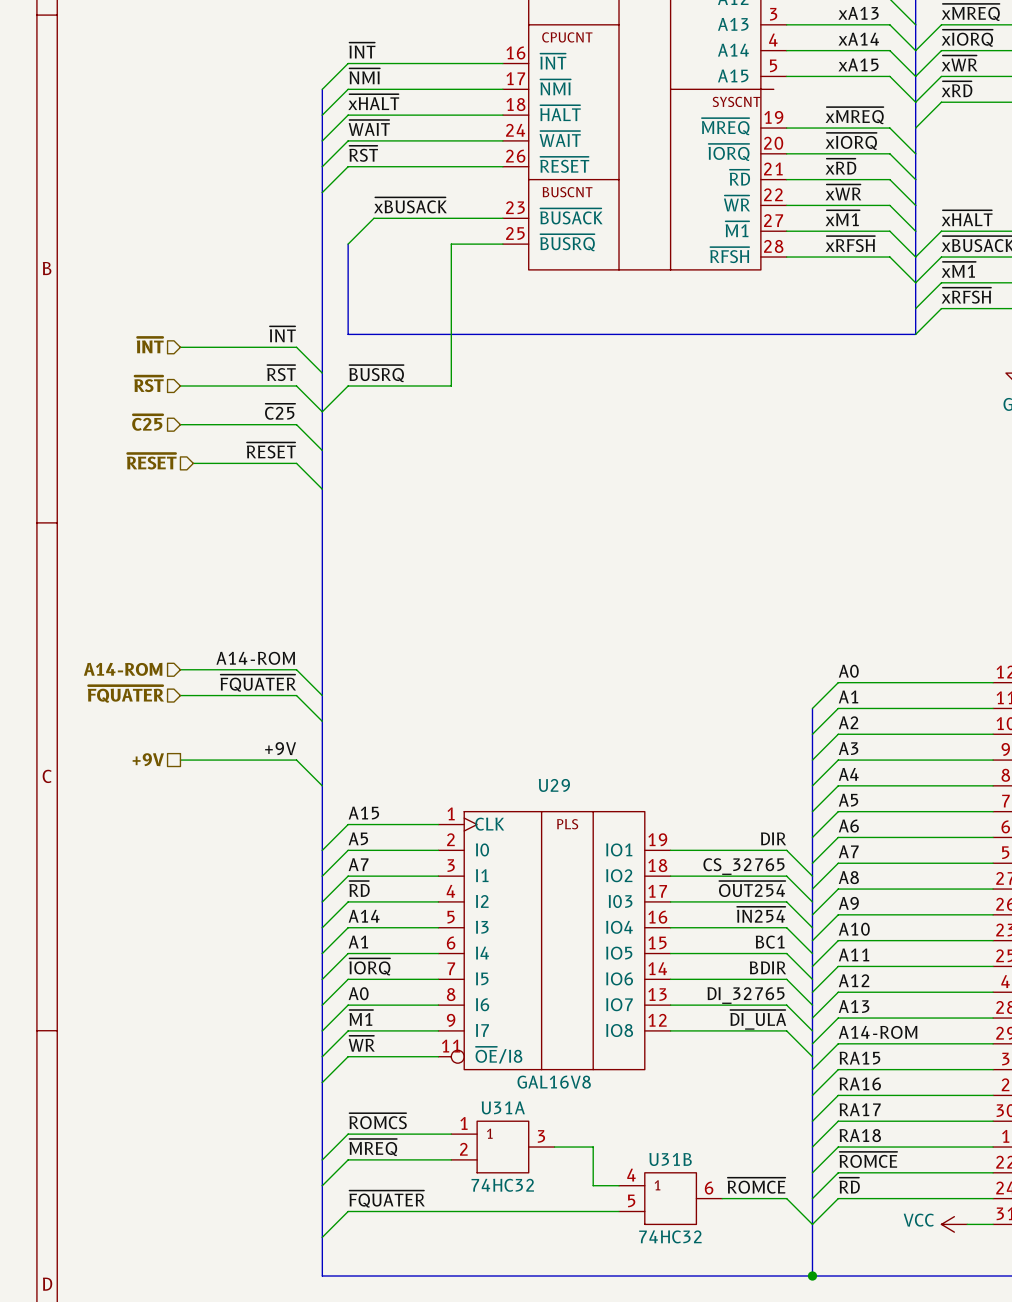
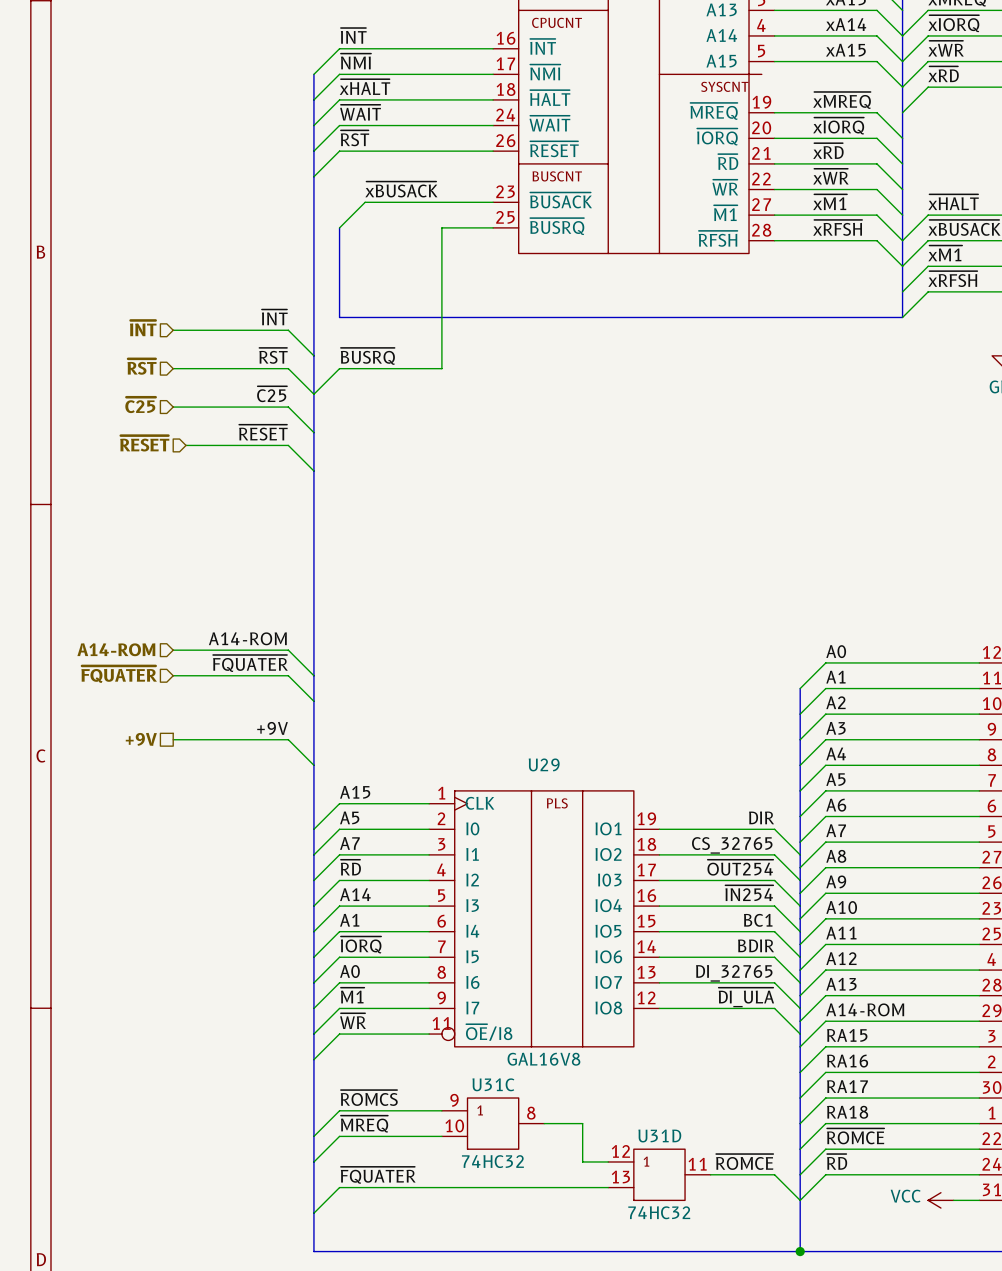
U31A name: U31A (503, 1107) -> U31C (493, 1084)
U31A pin number: 1 (463, 1123) -> 9 (454, 1100)
U31A pin number: 3 (541, 1136) -> 8 (531, 1113)
U31A pin number: 2 (463, 1149) -> 10 (454, 1125)
U31B name: U31B (670, 1159) -> U31D (659, 1135)
U31B pin number: 4 (631, 1175) -> 12 (620, 1151)
U31B pin number: 6 (709, 1188) -> 11 (697, 1164)
U31B pin number: 5 (631, 1200) -> 13 (620, 1177)

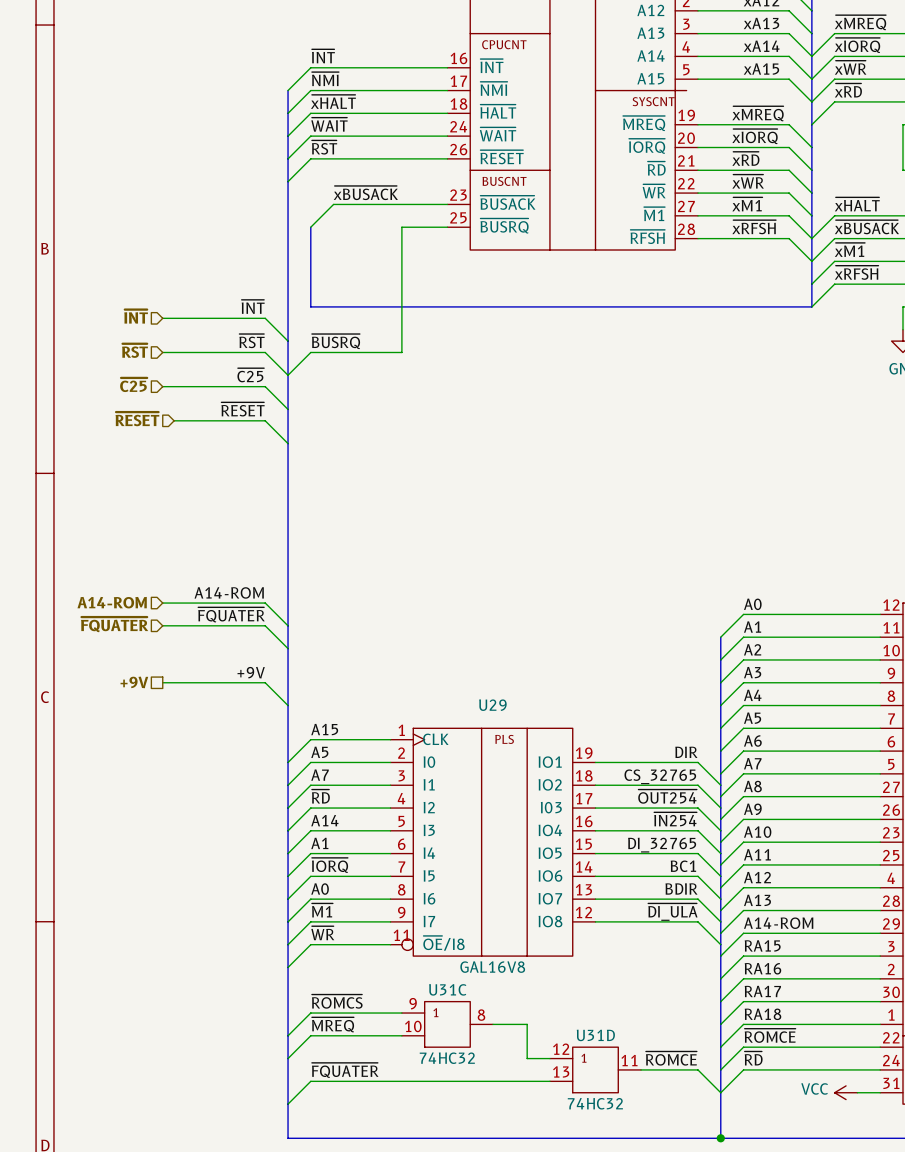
label: BC1 (758, 920) -> DI_32765 (662, 845)
label: BDIR (756, 945) -> BC1 (683, 866)
label: DI_32765 (734, 973) -> BDIR (681, 888)

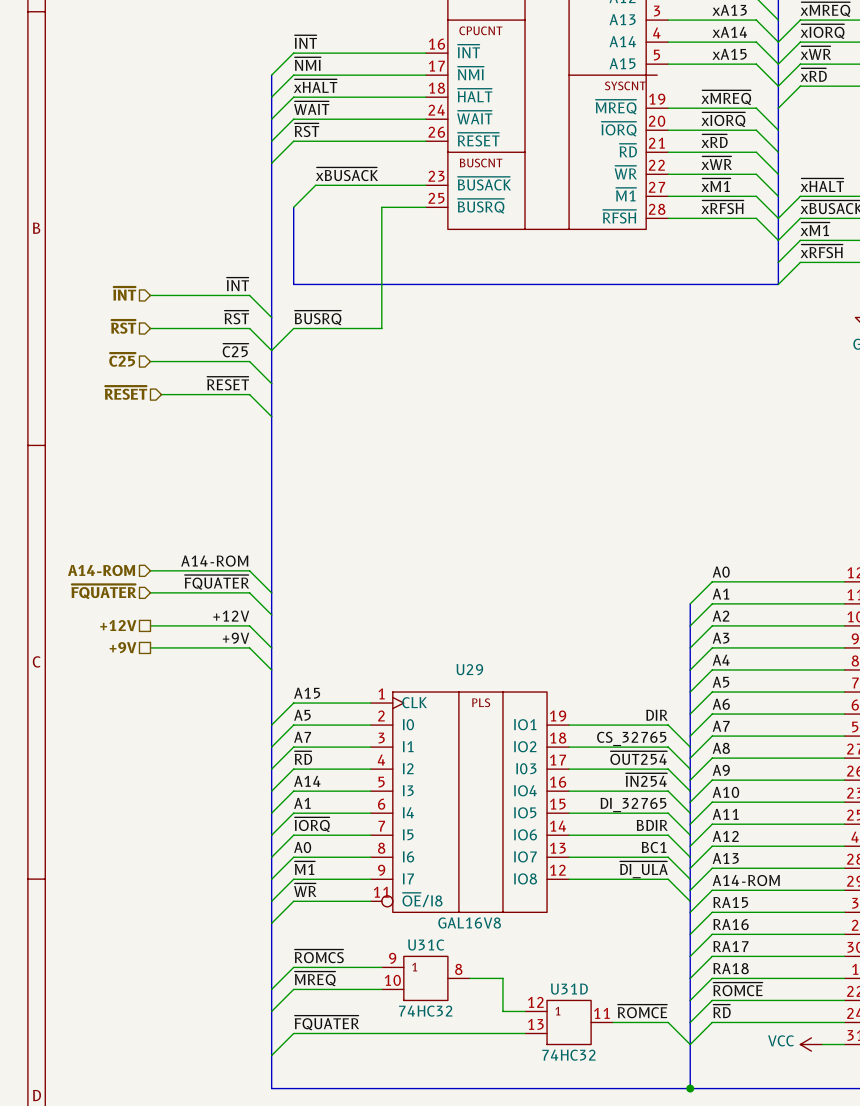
label: none -> +12V (231, 616)
hierarchical label: none -> +12V (118, 625)
wire: none -> (150, 625) (249, 625) (271, 647)
label: BC1 (683, 866) -> BDIR (652, 825)
label: BDIR (681, 888) -> BC1 (654, 847)

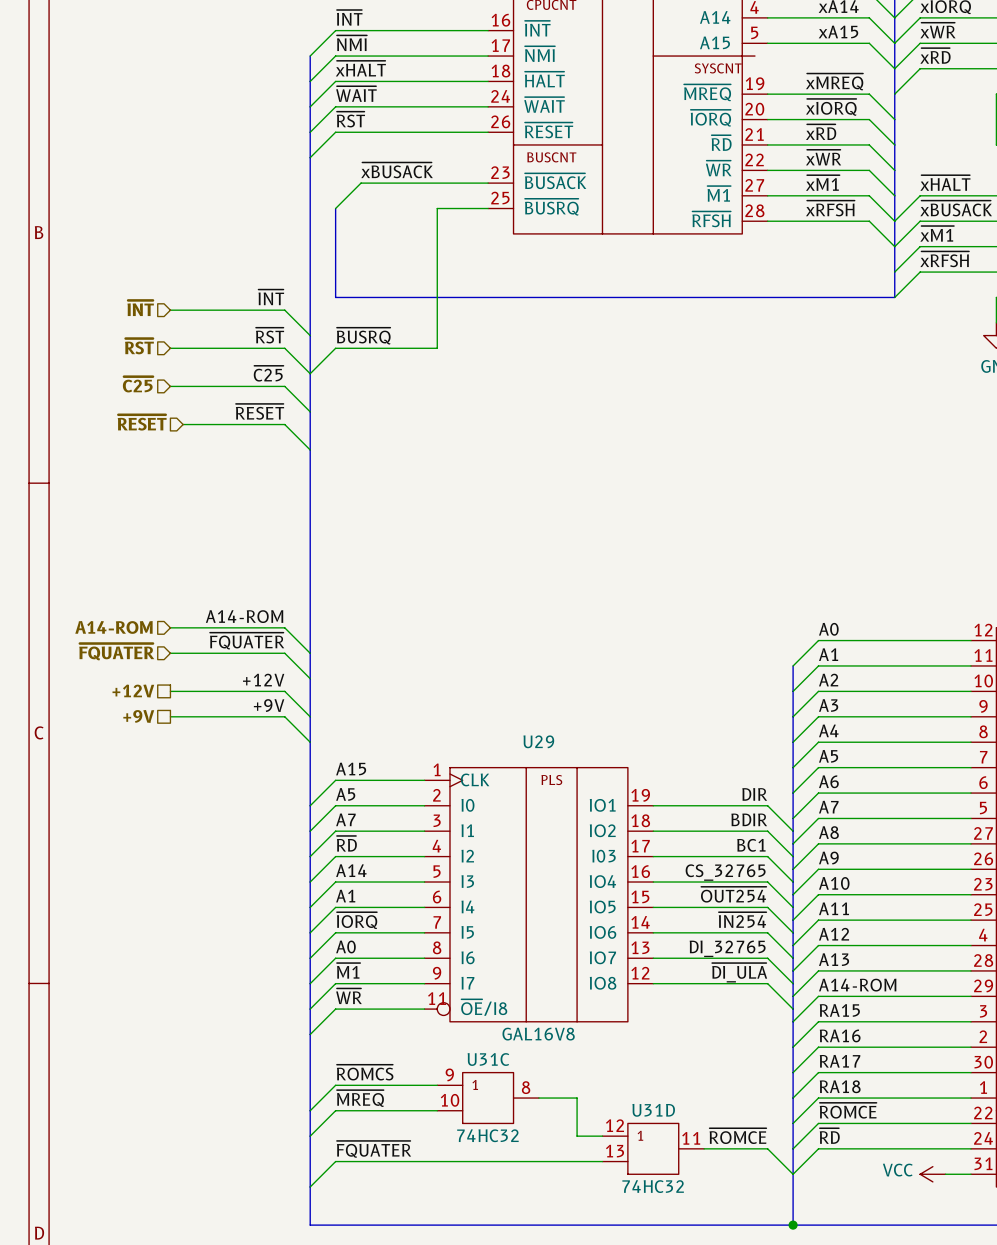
label: CS_32765 (631, 738) -> BDIR (749, 819)
label: ~{OUT254} (638, 758) -> BC1 (751, 845)
label: ~{IN254} (646, 780) -> CS_32765 (725, 872)
label: DI_32765 (633, 805) -> ~{OUT254} (733, 894)
label: BDIR (652, 825) -> ~{IN254} (742, 920)
label: BC1 (654, 847) -> DI_32765 (727, 948)

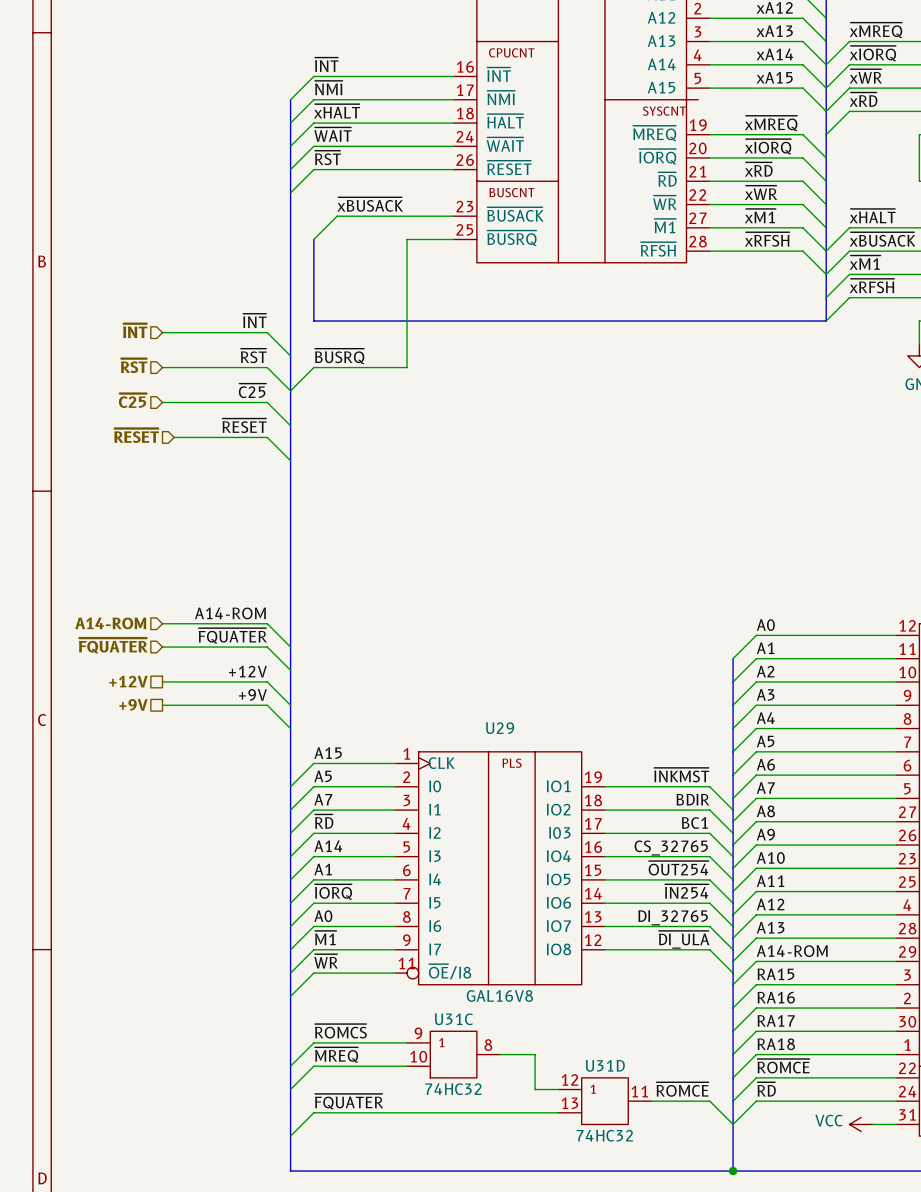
label: DIR (754, 794) -> ~{INKMST} (681, 775)

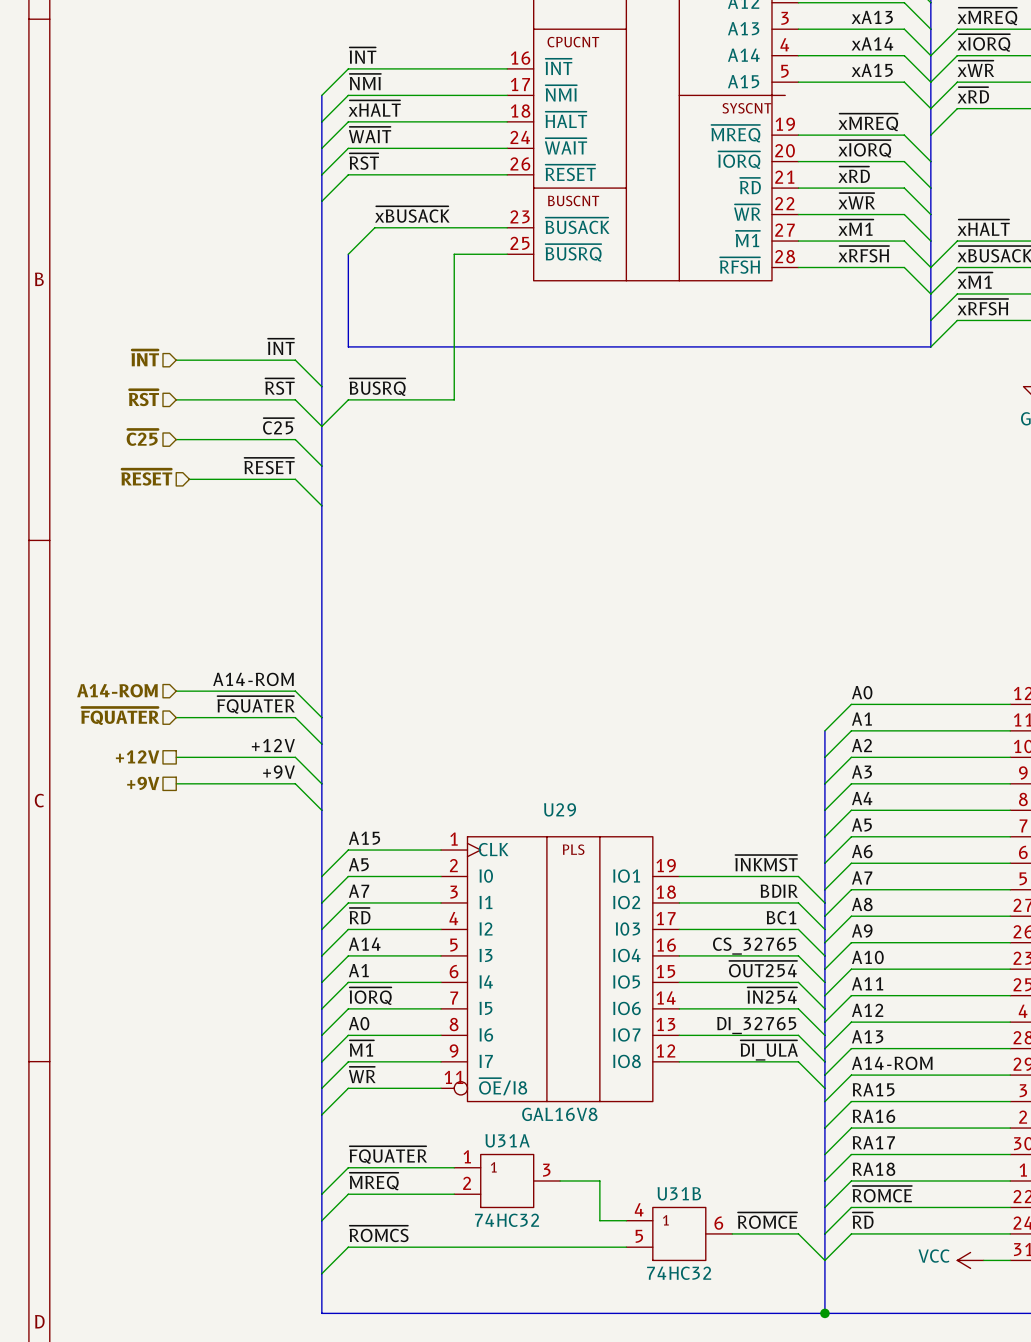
U31C name: U31C (453, 1019) -> U31A (507, 1140)
label: ~{ROMCS} (340, 1031) -> ~{FQUATER} (388, 1155)
U31C pin number: 9 (418, 1033) -> 1 (467, 1156)
U31C pin number: 8 (488, 1045) -> 3 (546, 1170)
U31C pin number: 10 (418, 1056) -> 2 (467, 1183)
U31D name: U31D (605, 1065) -> U31B (679, 1193)
U31D pin number: 12 (569, 1079) -> 4 (639, 1209)
U31D pin number: 11 (639, 1091) -> 6 (718, 1223)
label: ~{FQUATER} (349, 1101) -> ~{ROMCS} (379, 1233)
U31D pin number: 13 (569, 1103) -> 5 (639, 1236)

